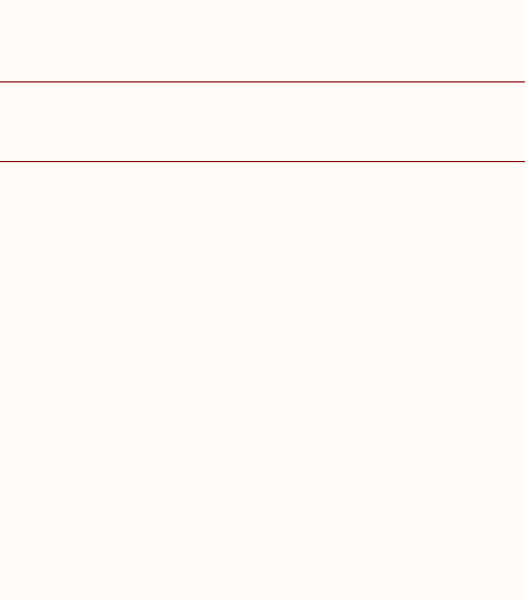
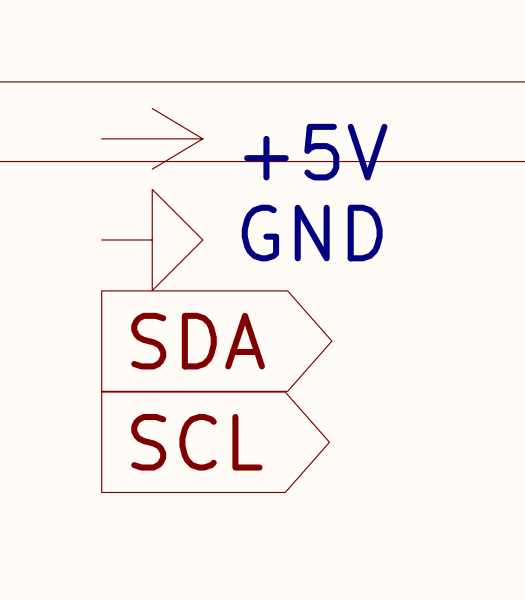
power symbol: none -> +5V (152, 138)
power symbol: none -> GND (152, 239)
global label: none -> SDA (198, 341)
global label: none -> SCL (196, 442)

